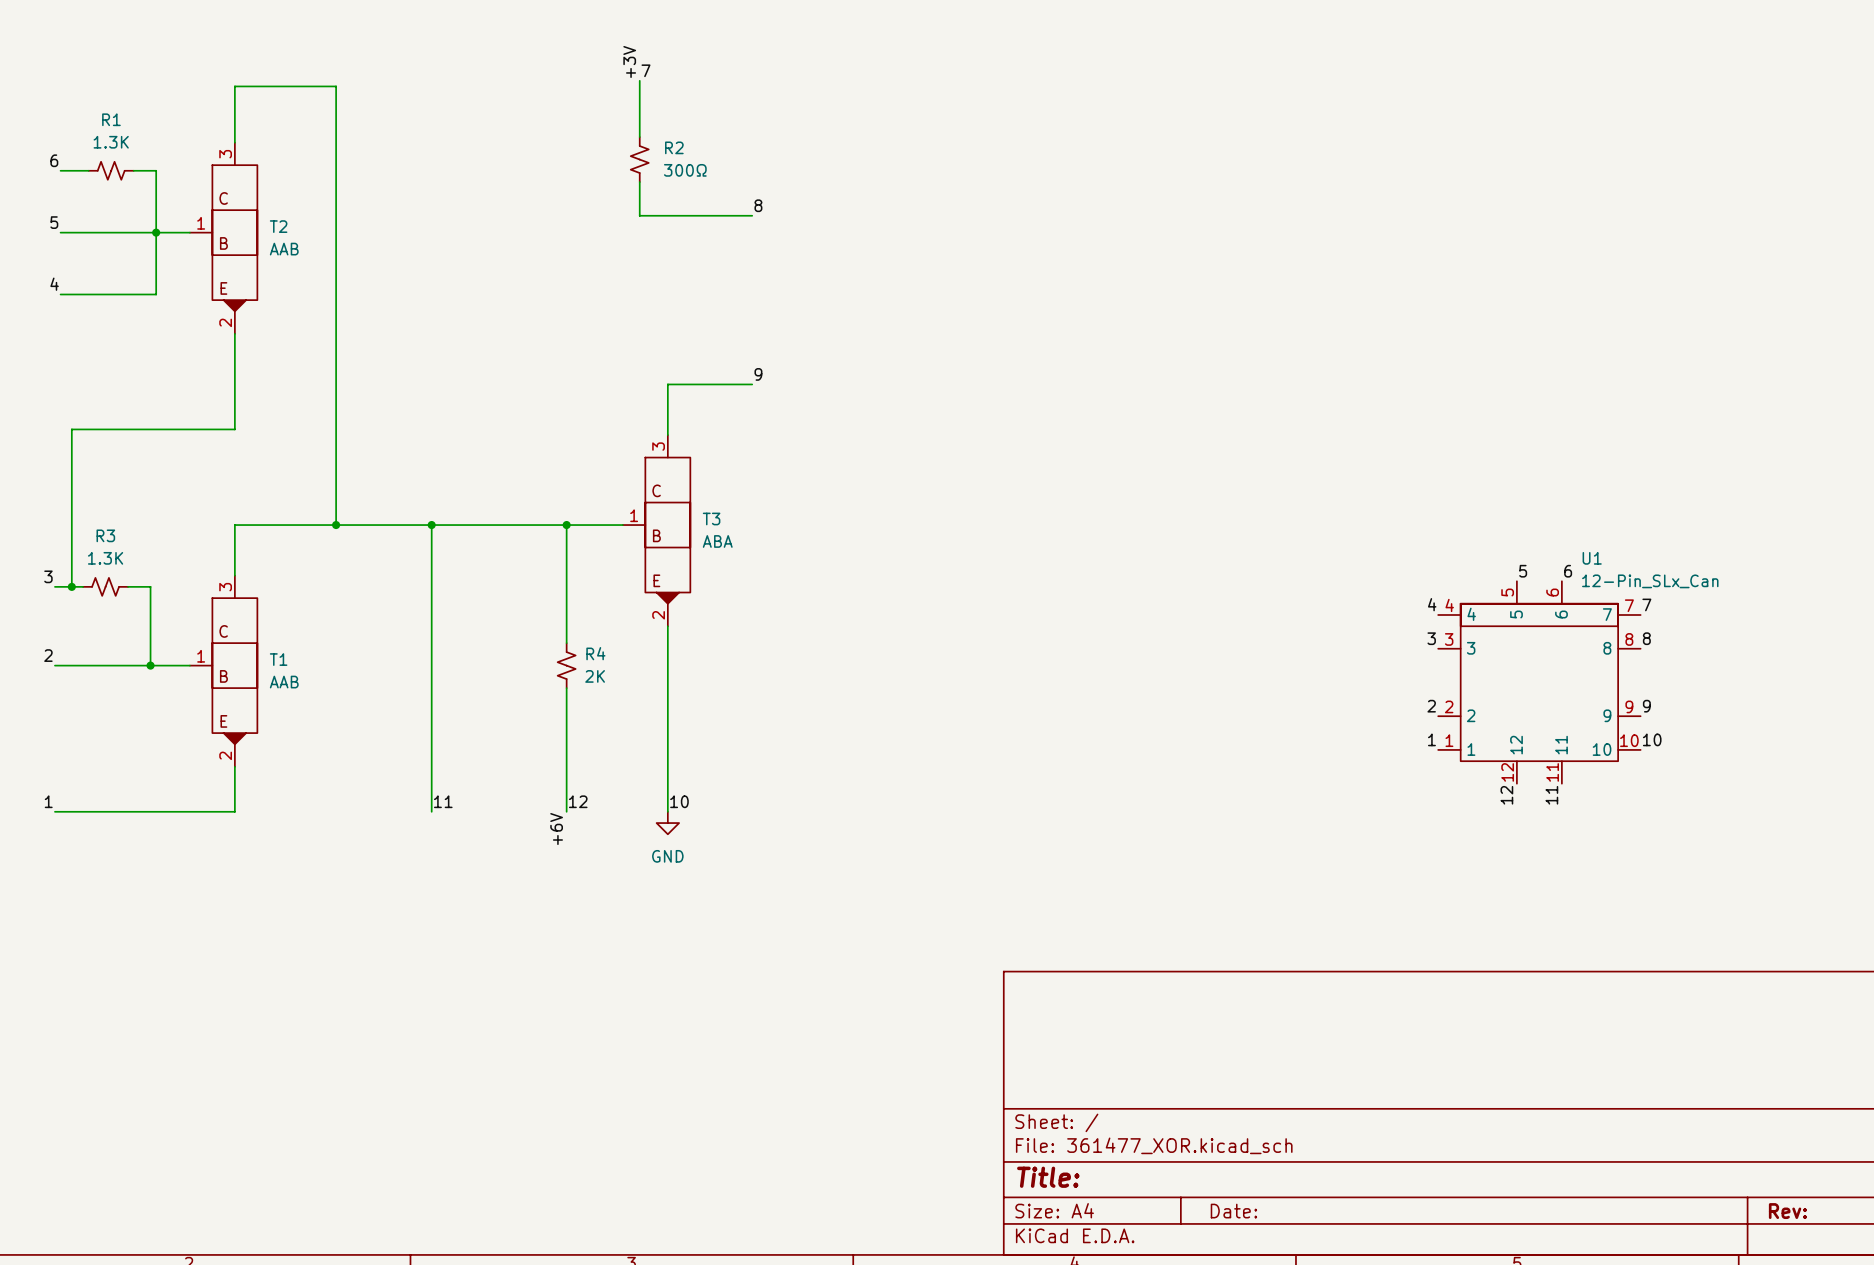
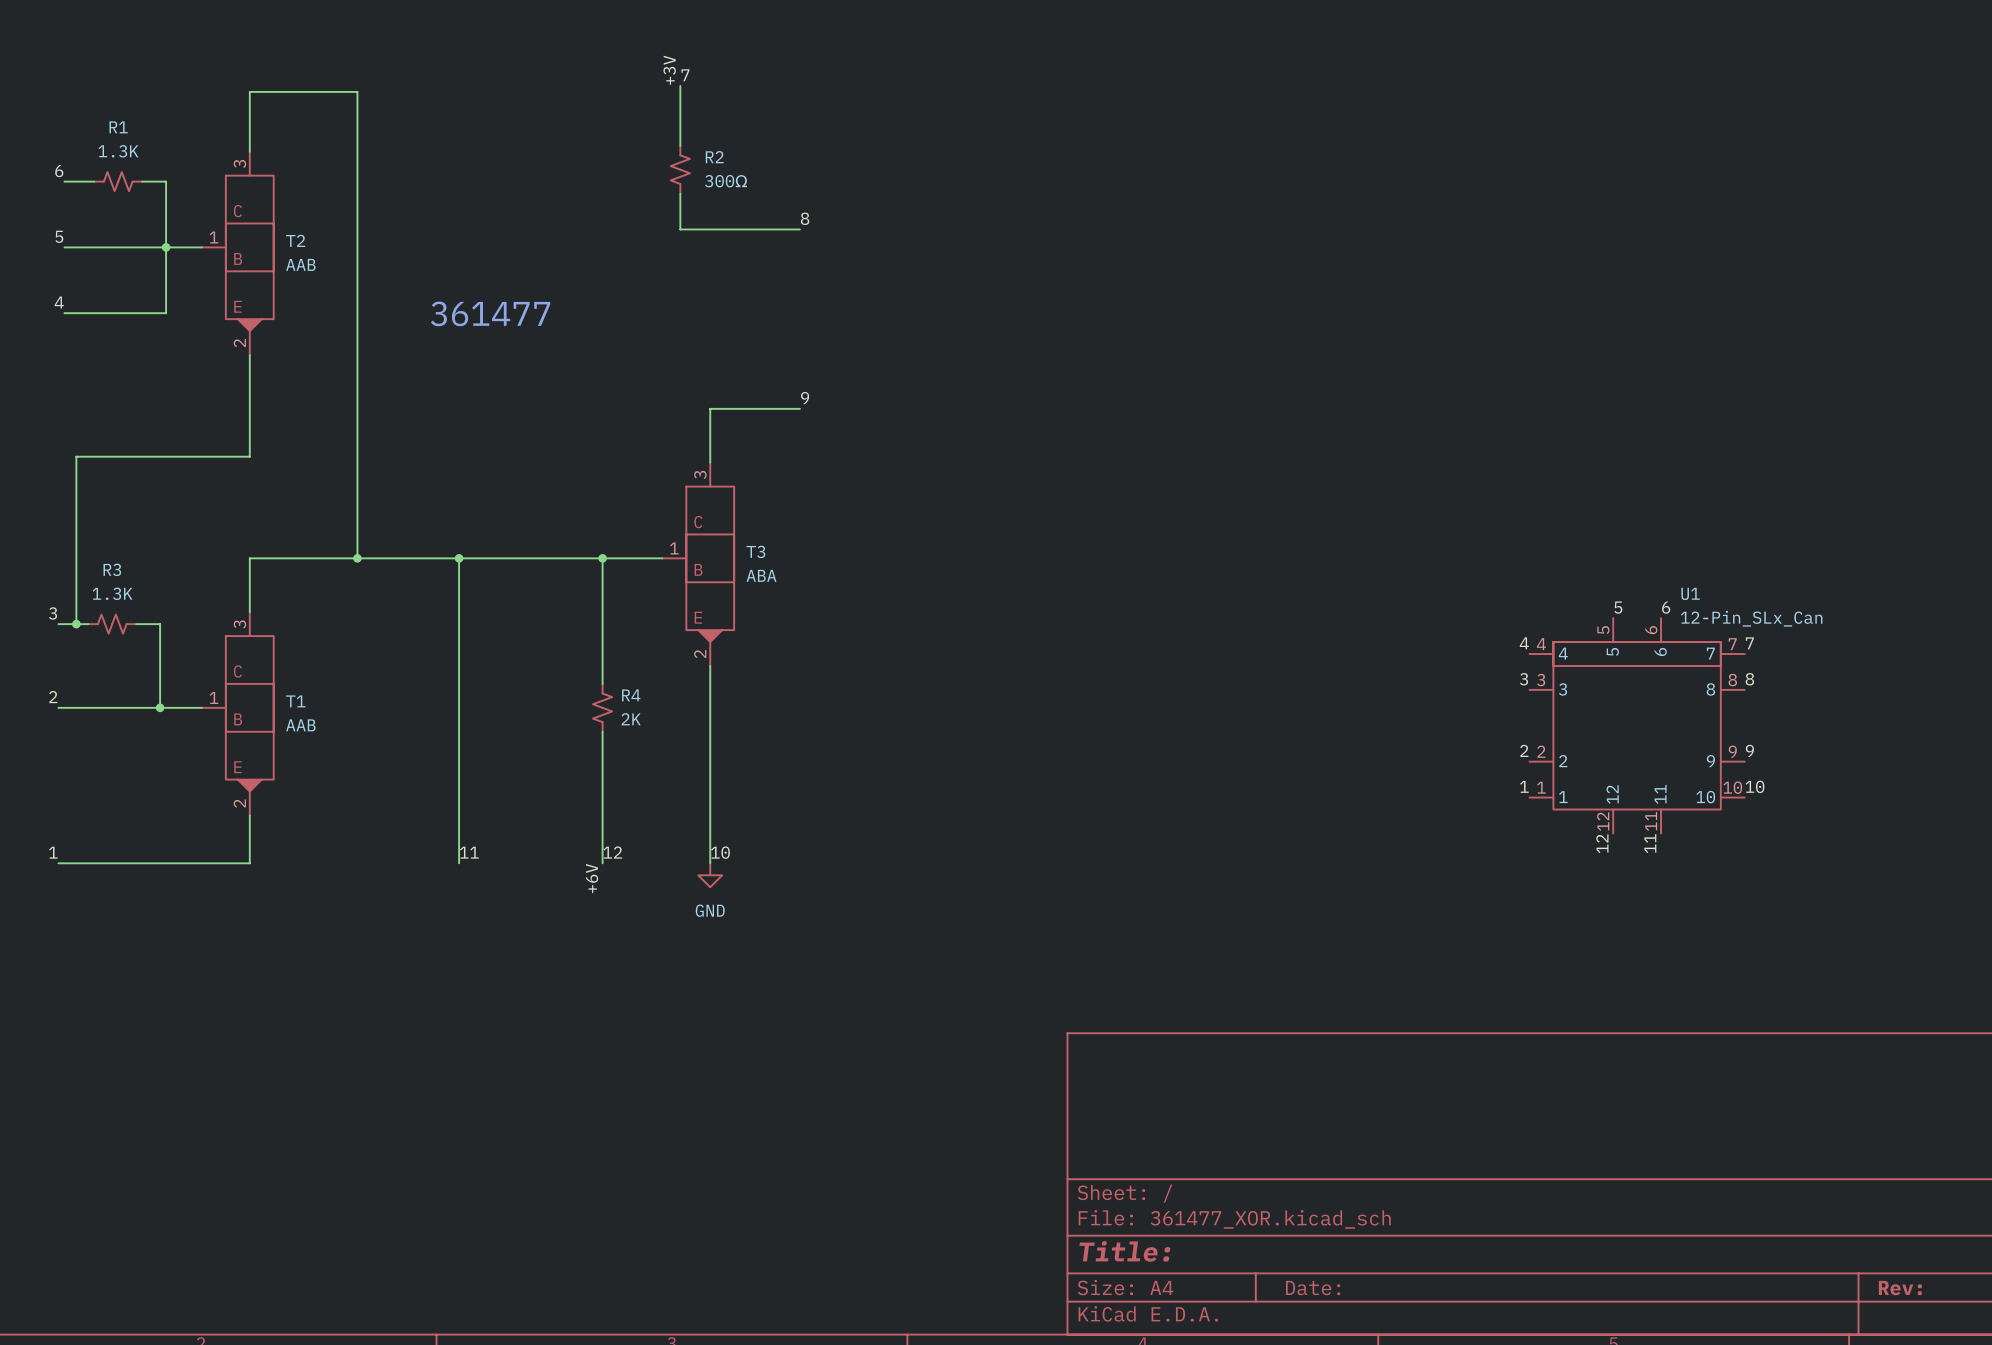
text: none -> 361477 (490, 313)

